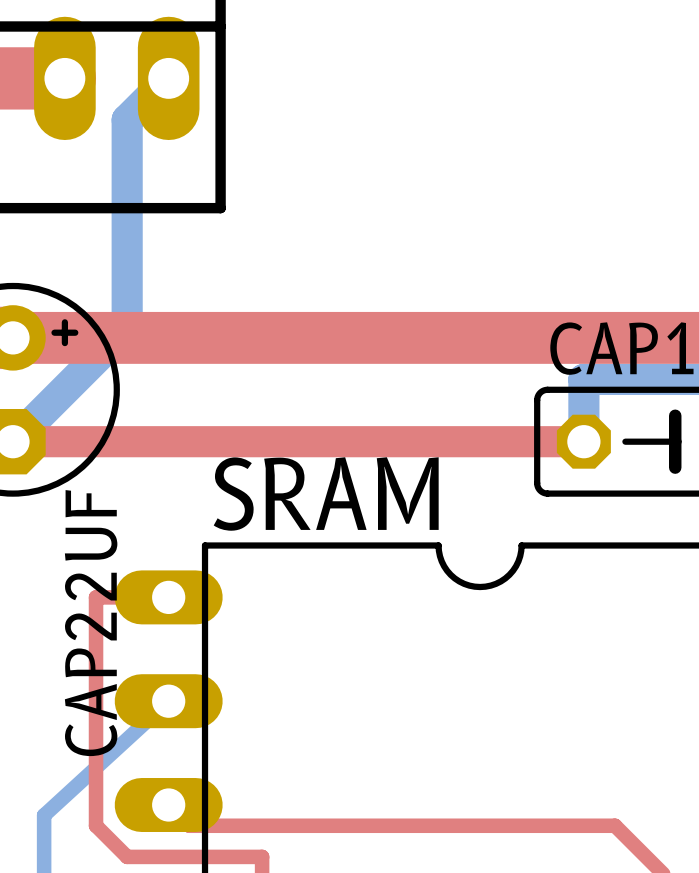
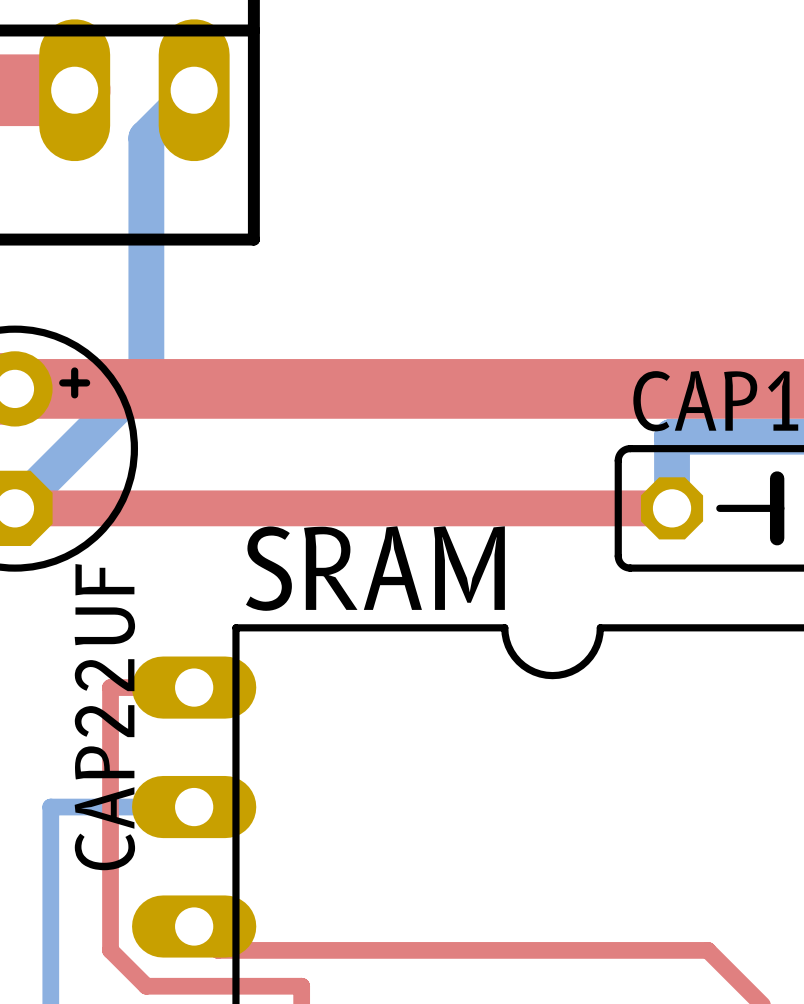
bottom track: (168, 701) (44, 815) -> (194, 807) (50, 807) (50, 938)

